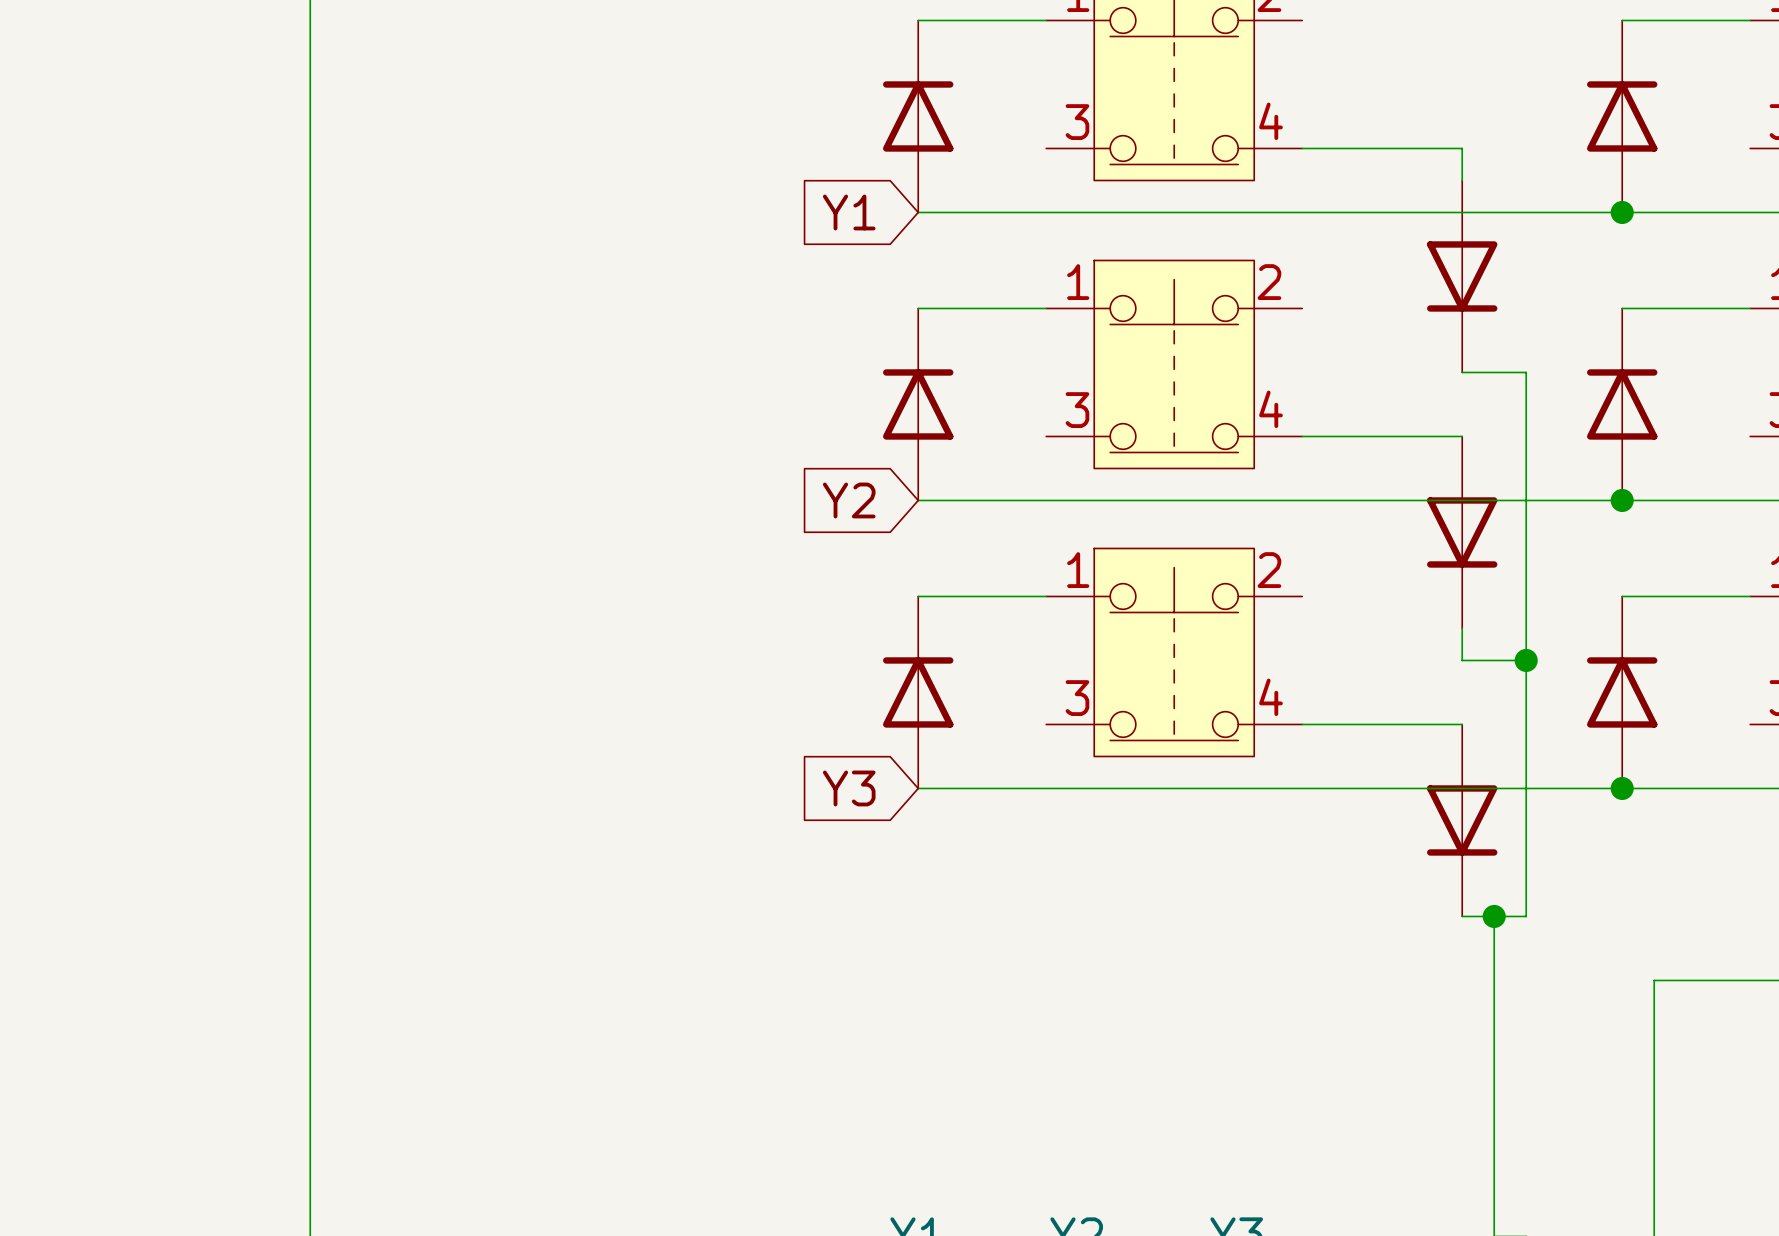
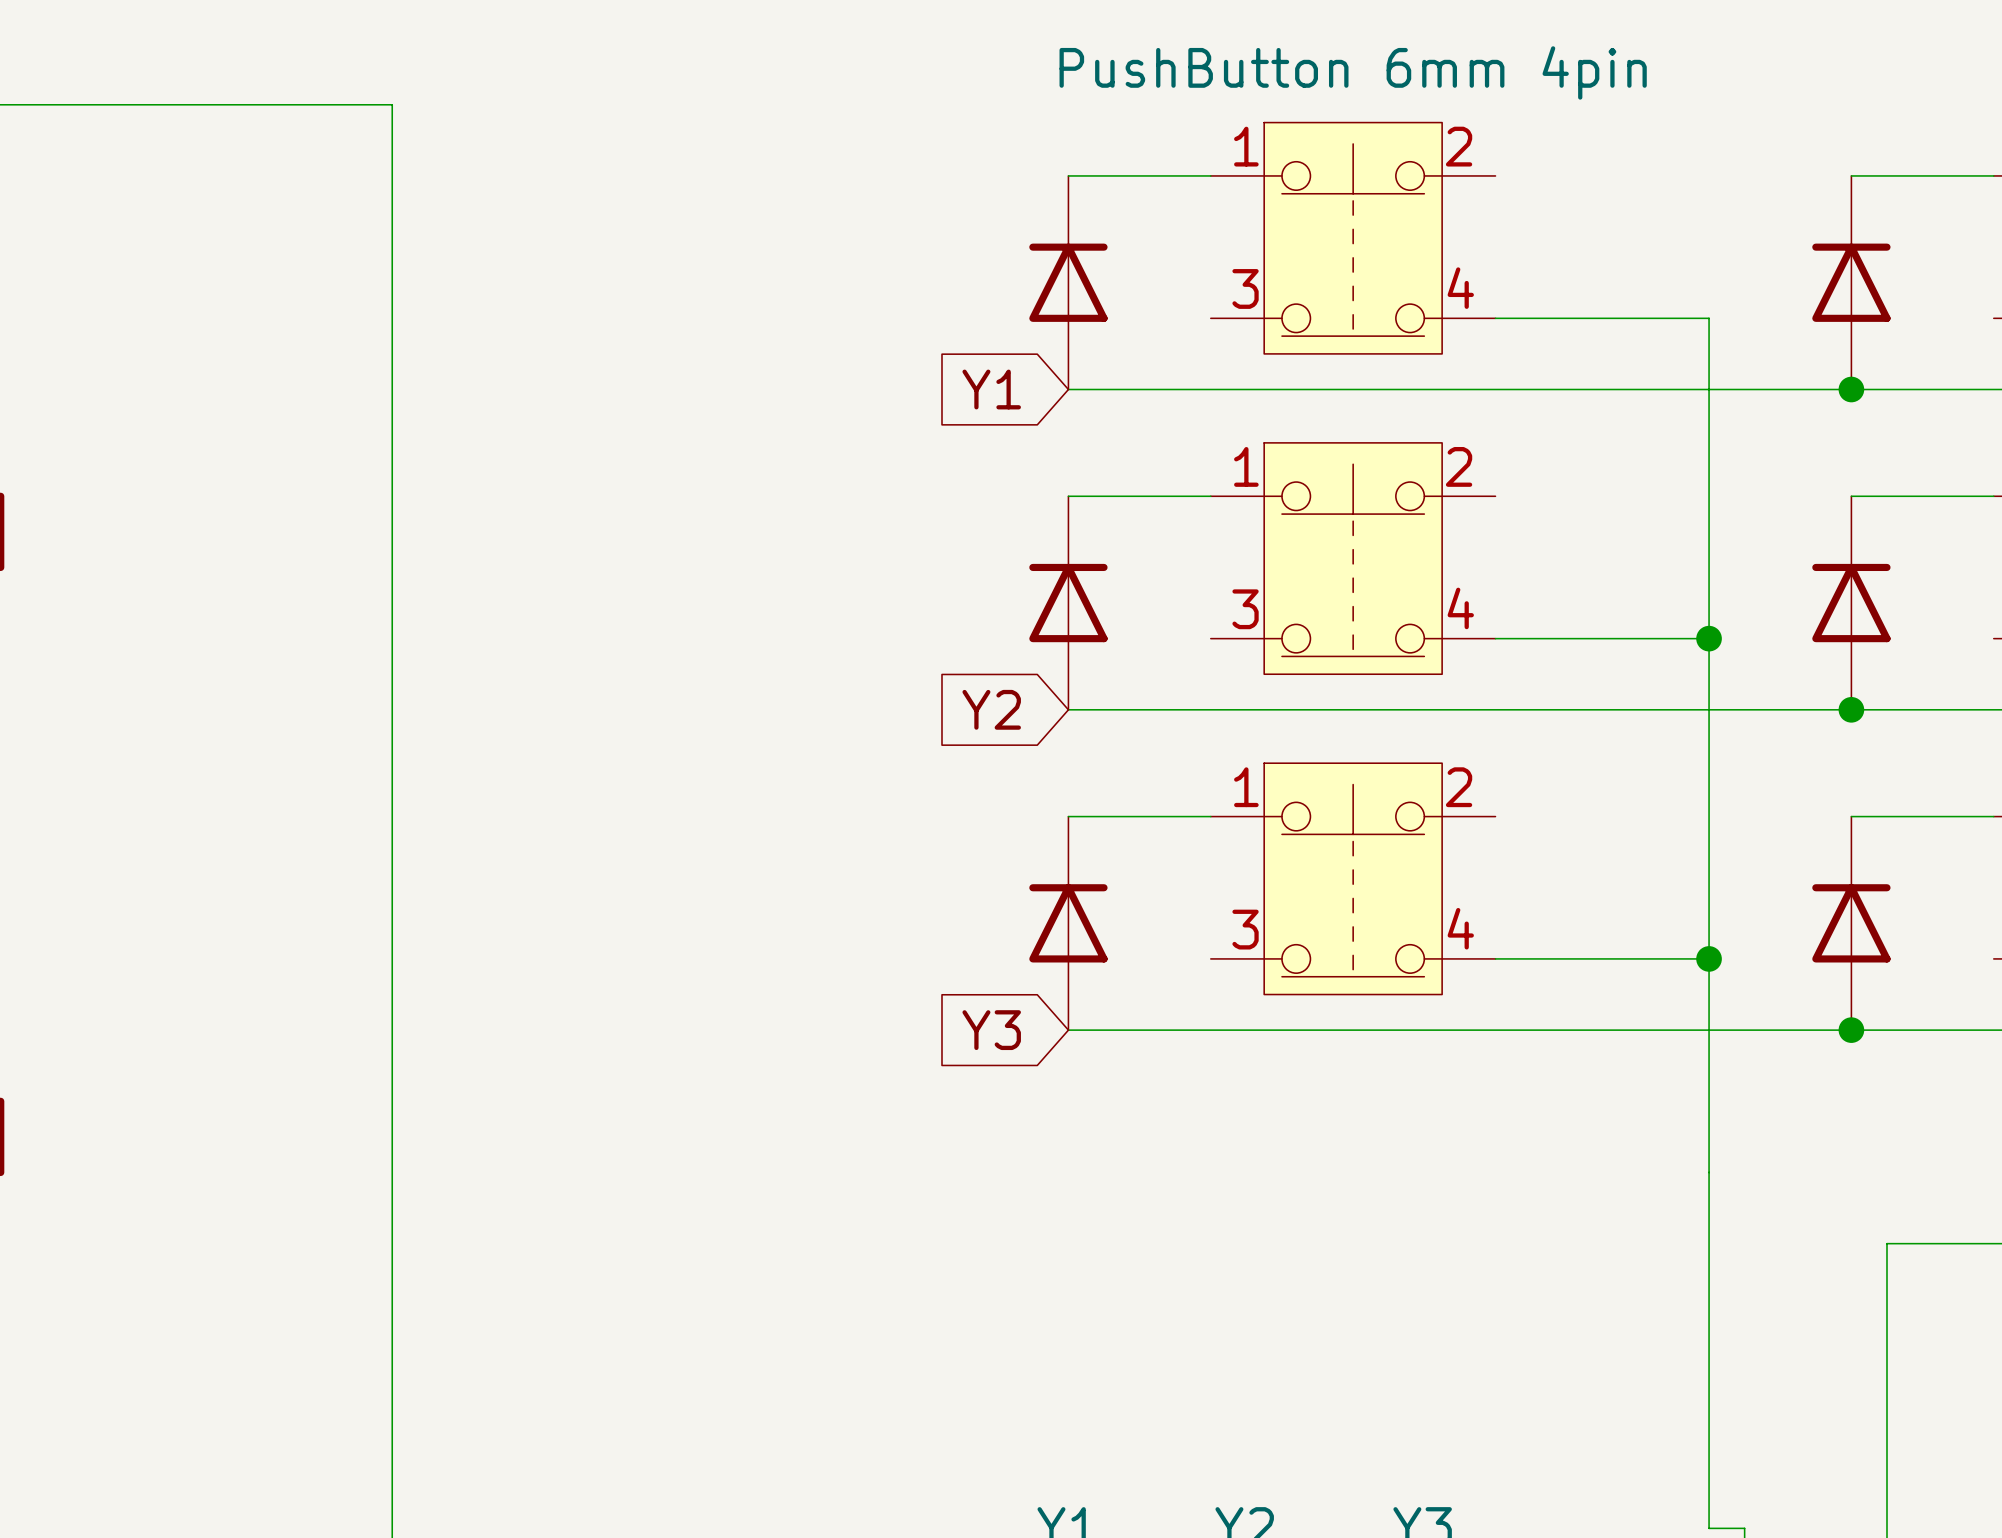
wire: (1462, 148) (1462, 180) -> (1673, 318) (1709, 318) (1709, 1172)
part: (1462, 276) -> none
wire: (1462, 372) (1526, 372) (1526, 916) (1462, 916) -> none
wire: none -> (1673, 638) (1709, 638)
junction: none -> (1709, 638)
part: (1462, 532) -> none
wire: (1462, 628) (1462, 660) (1526, 660) -> none
junction position: (1526, 660) -> (1709, 958)
wire: none -> (1673, 958) (1709, 958)
part: (1462, 820) -> none
junction: (1494, 916) -> none

